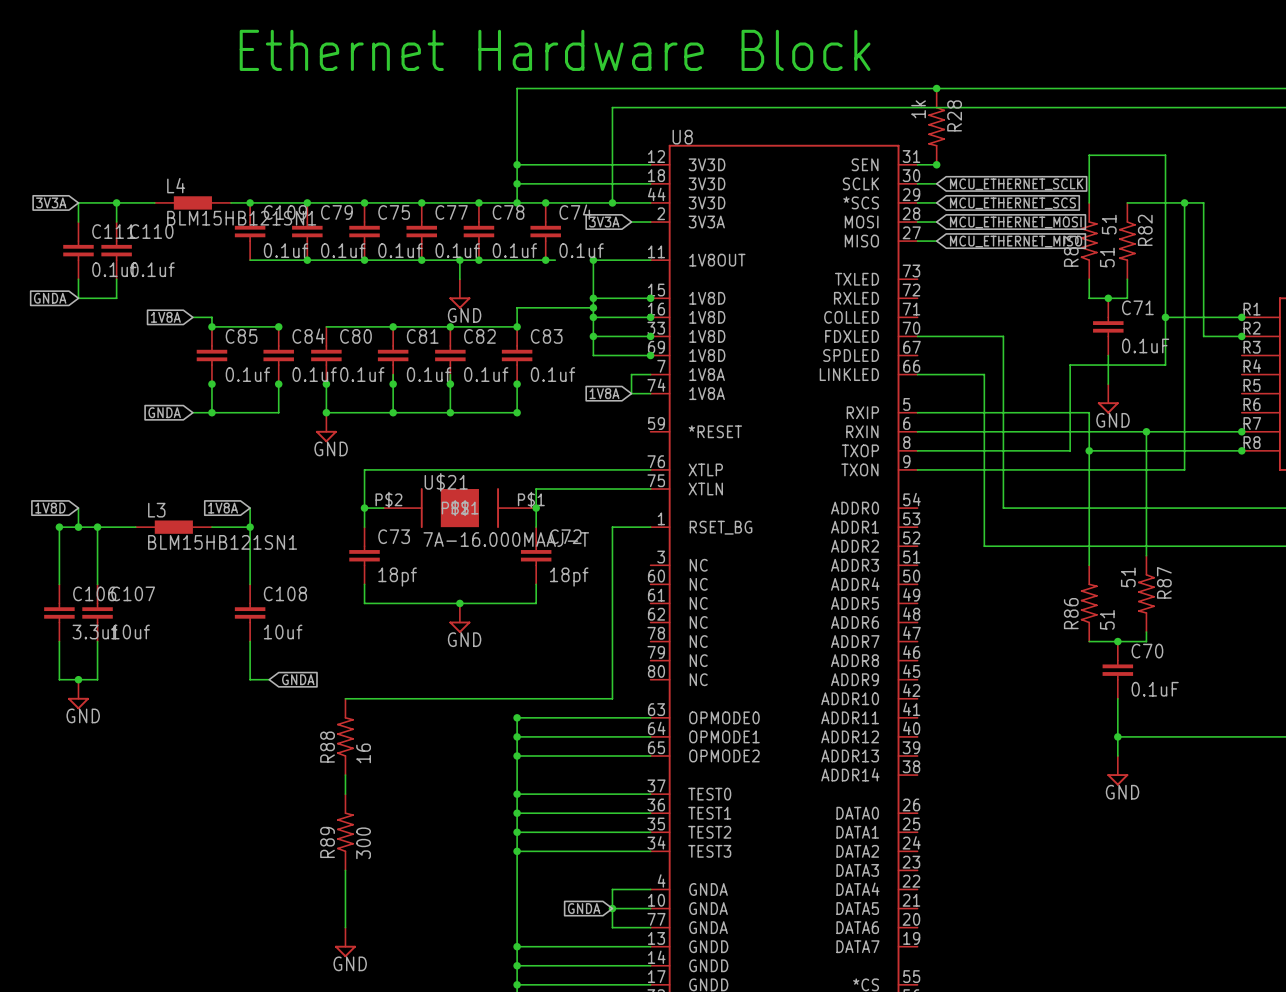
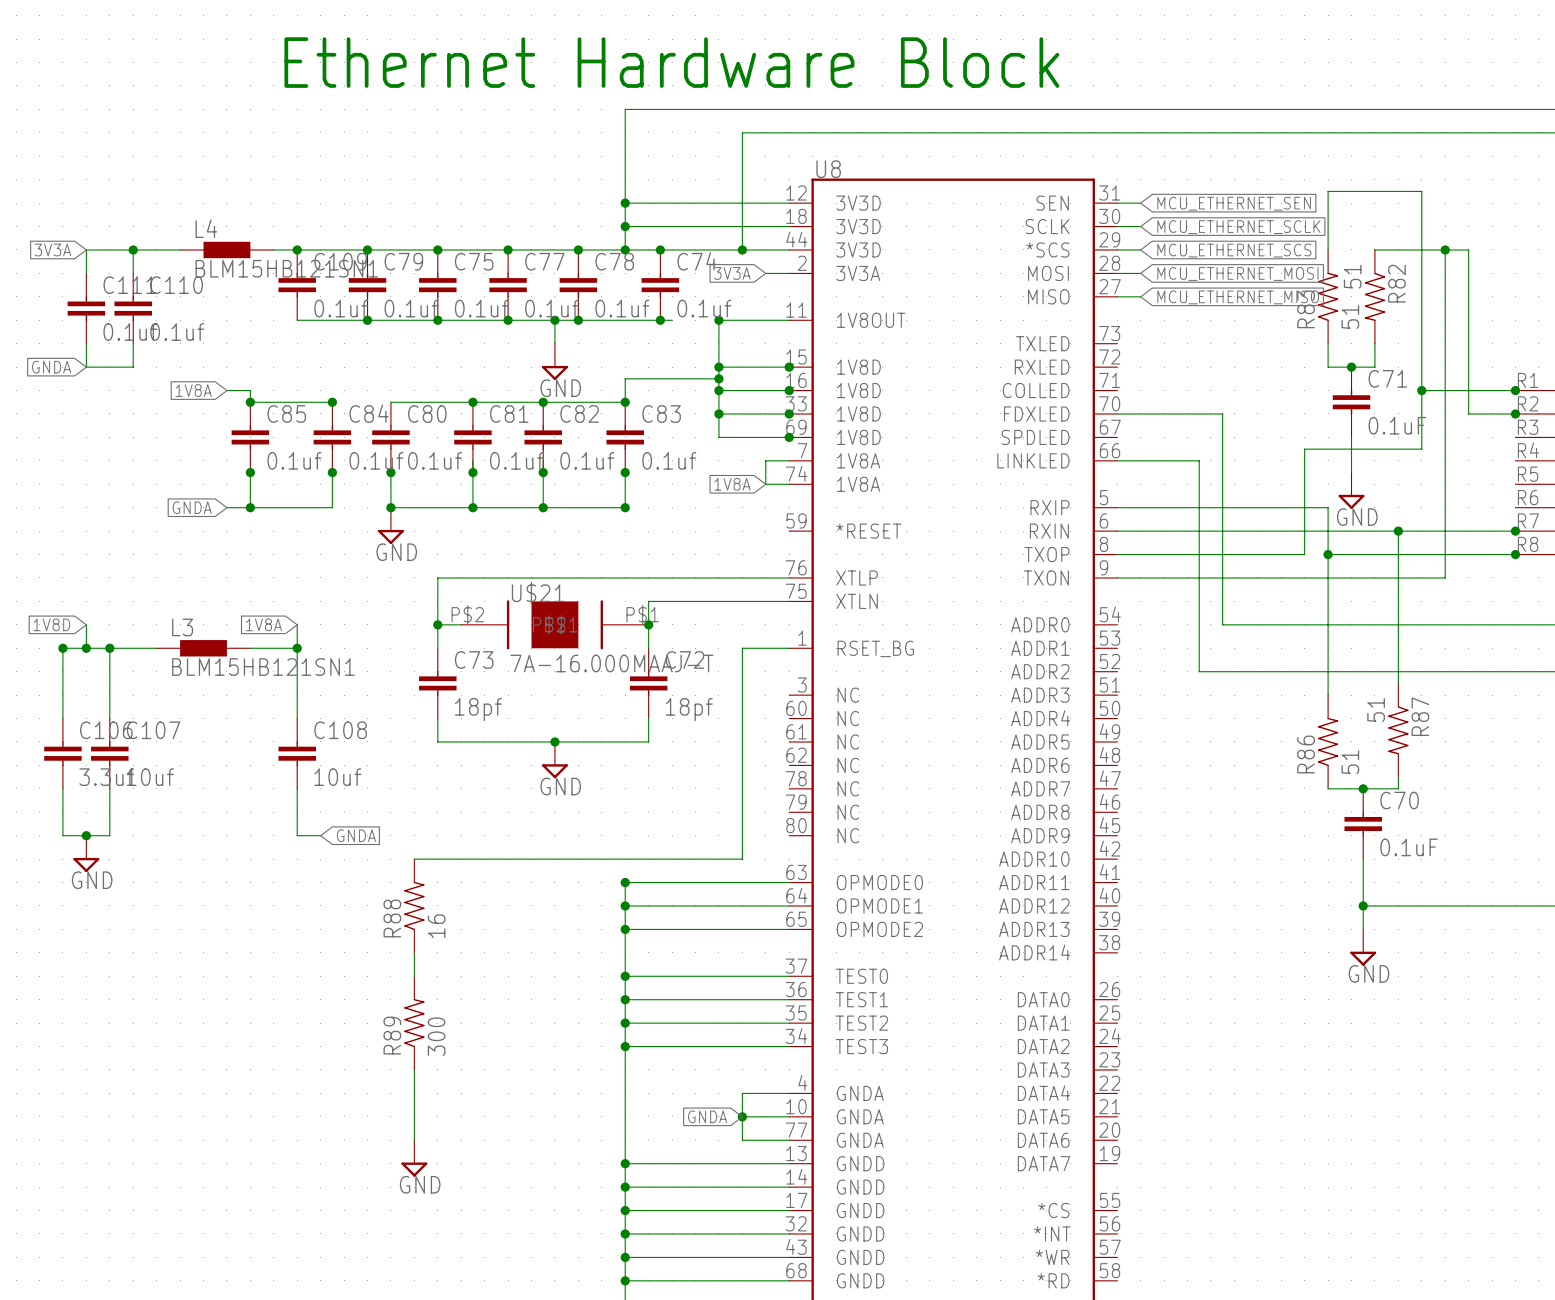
junction: (936, 88) -> none
R28: 1k (936, 126) -> none
junction: (936, 164) -> none
global label: none -> MCU_ETHERNET_SEN (1234, 203)

